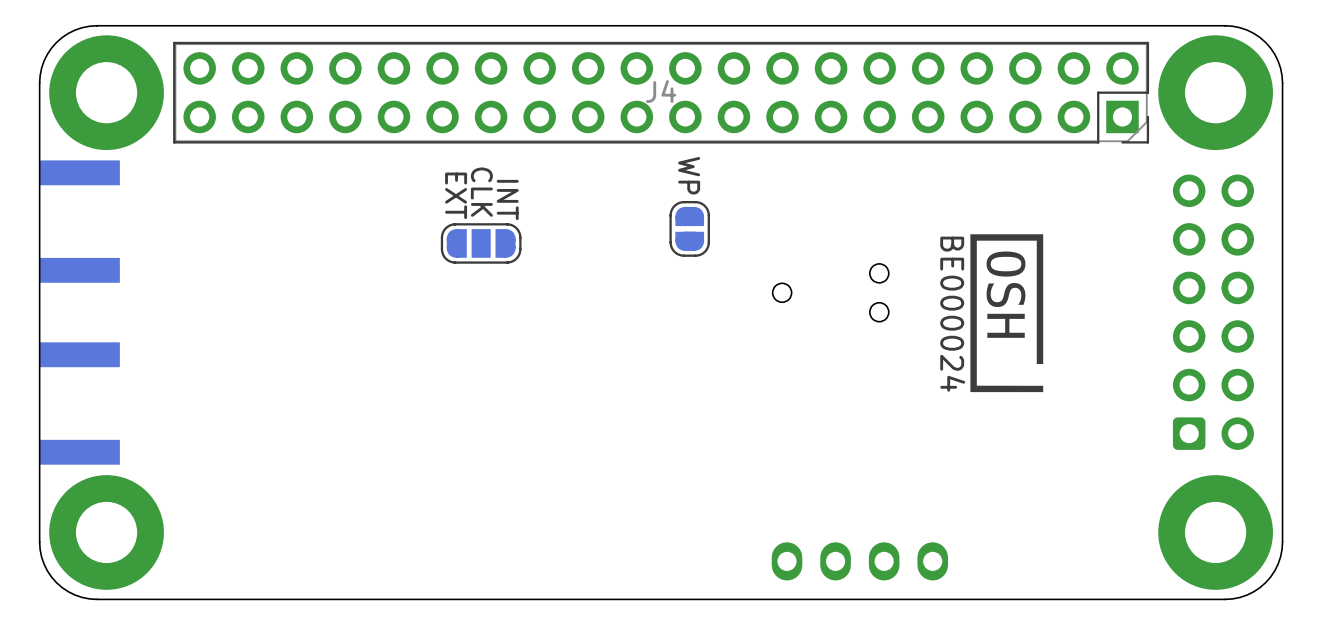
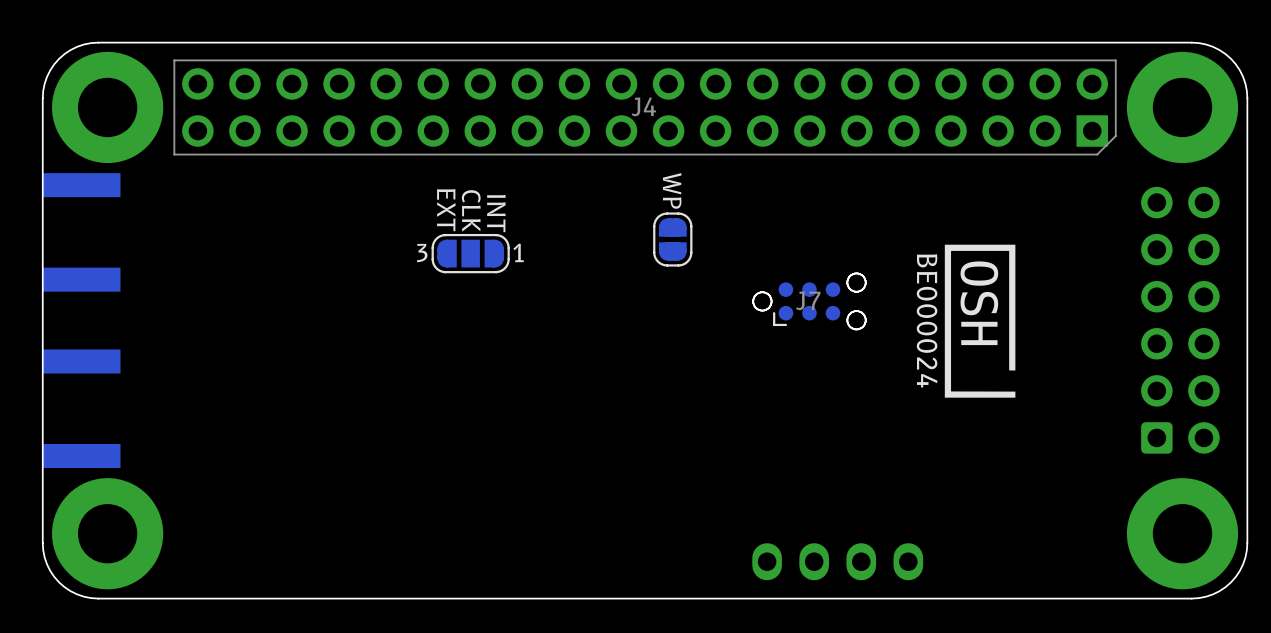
J4 footprint: [173, 41, 1150, 144] -> [173, 59, 1117, 156]
part text: none -> 3 (422, 253)
part text: none -> 1 (518, 252)
J7: none -> (809, 301)

